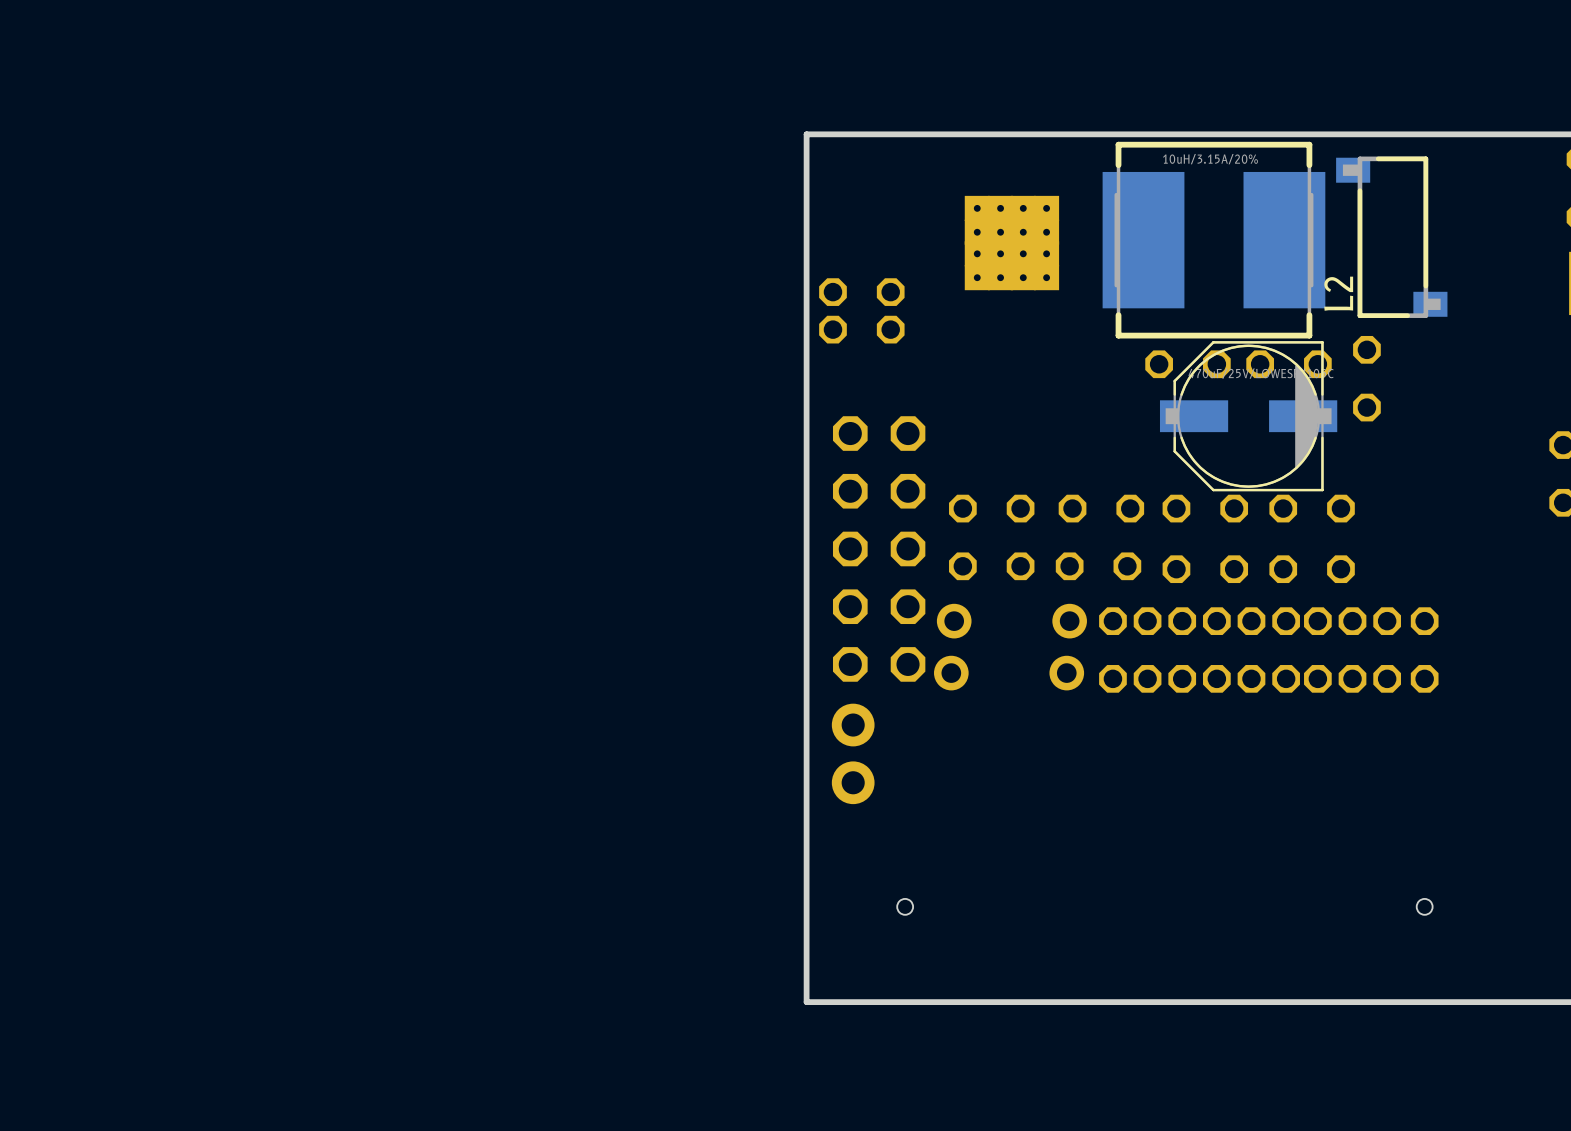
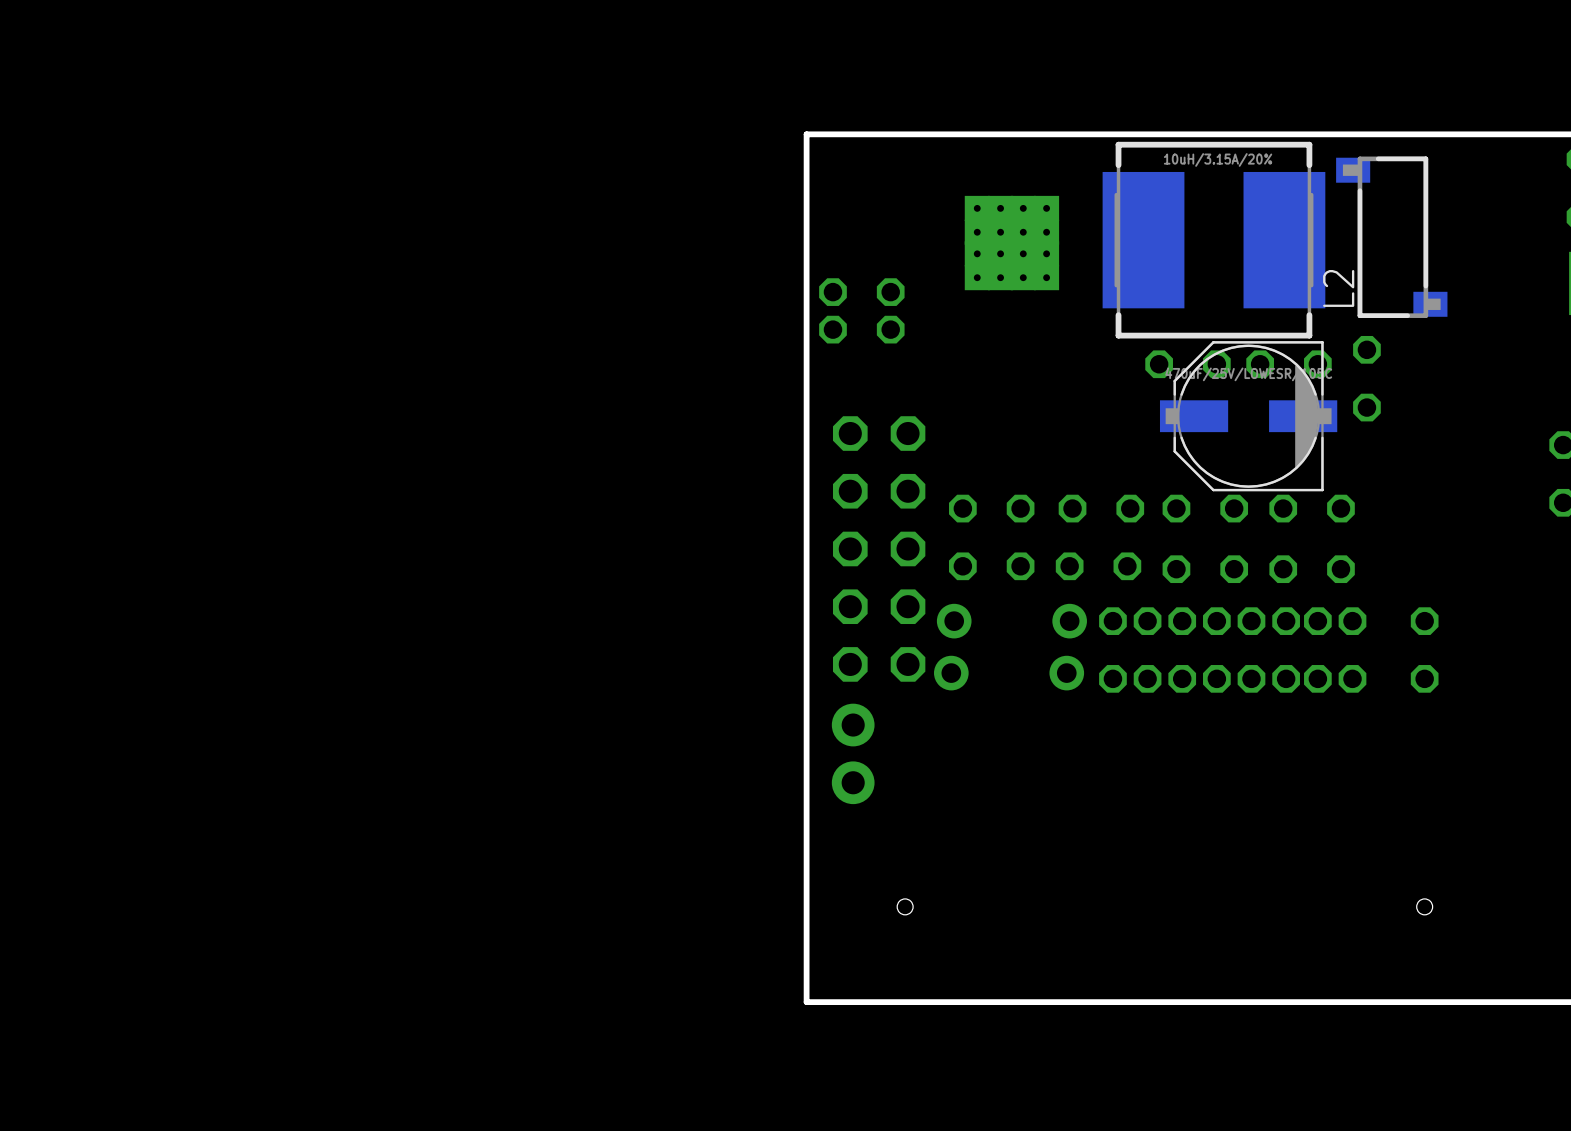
part: (1387, 649) -> none

